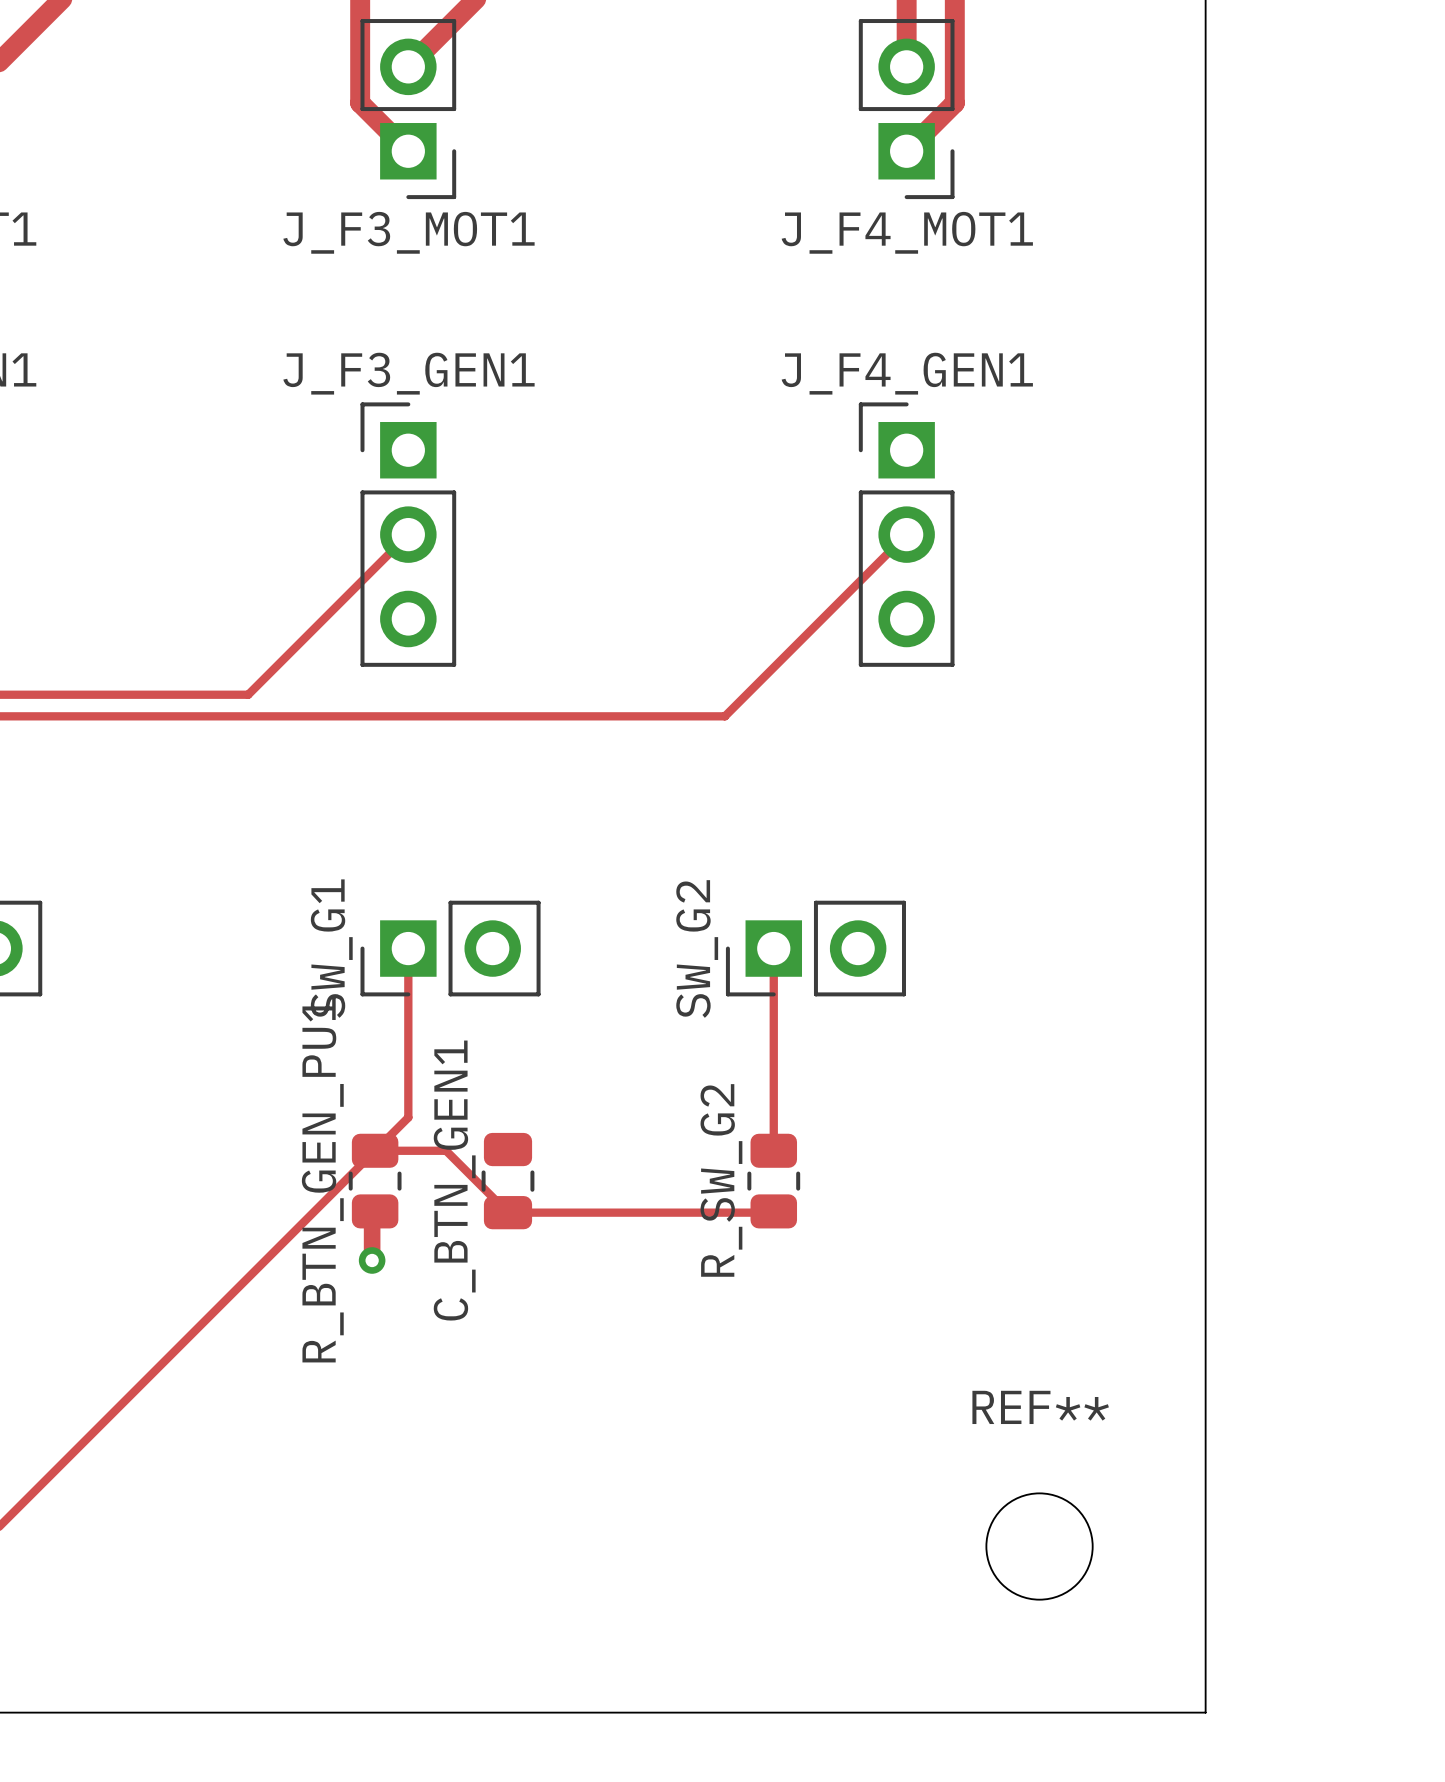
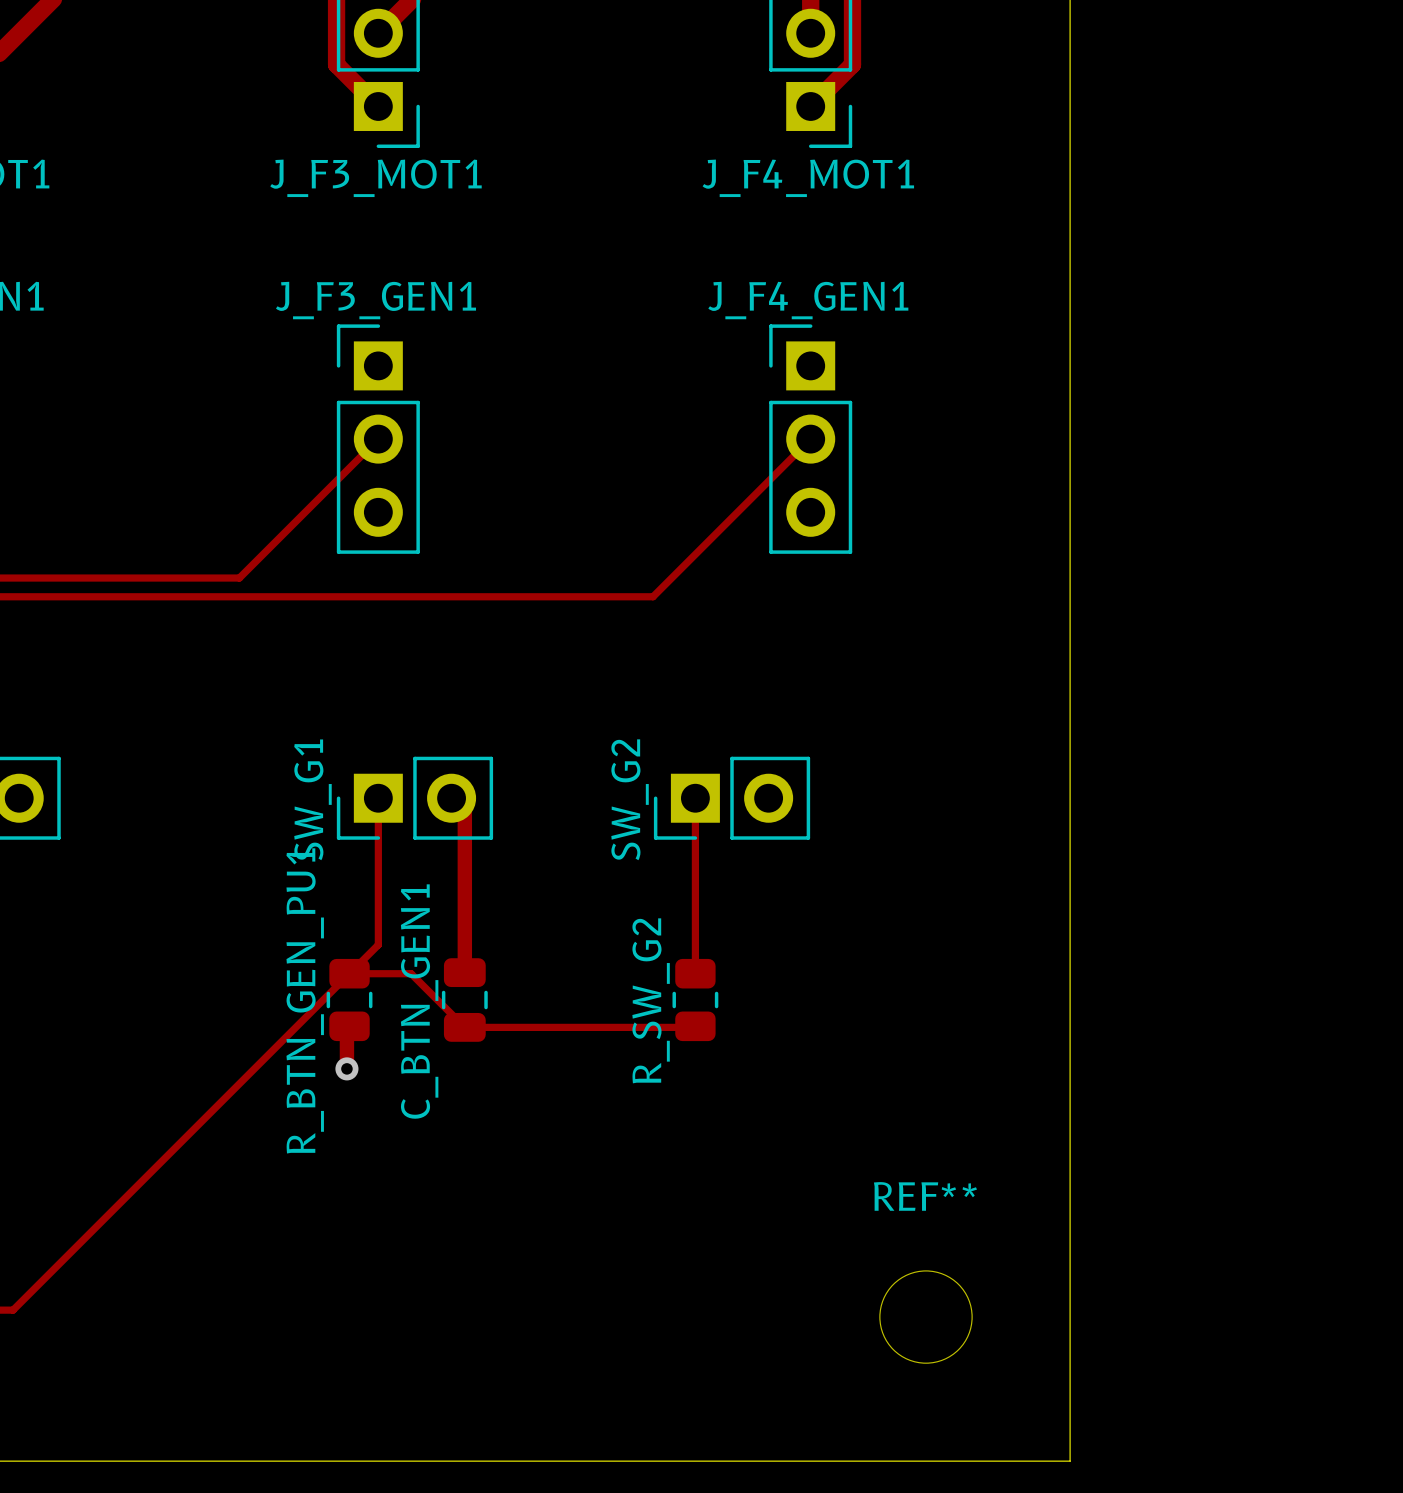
track: none -> (451, 798) (464, 811) (464, 972)

